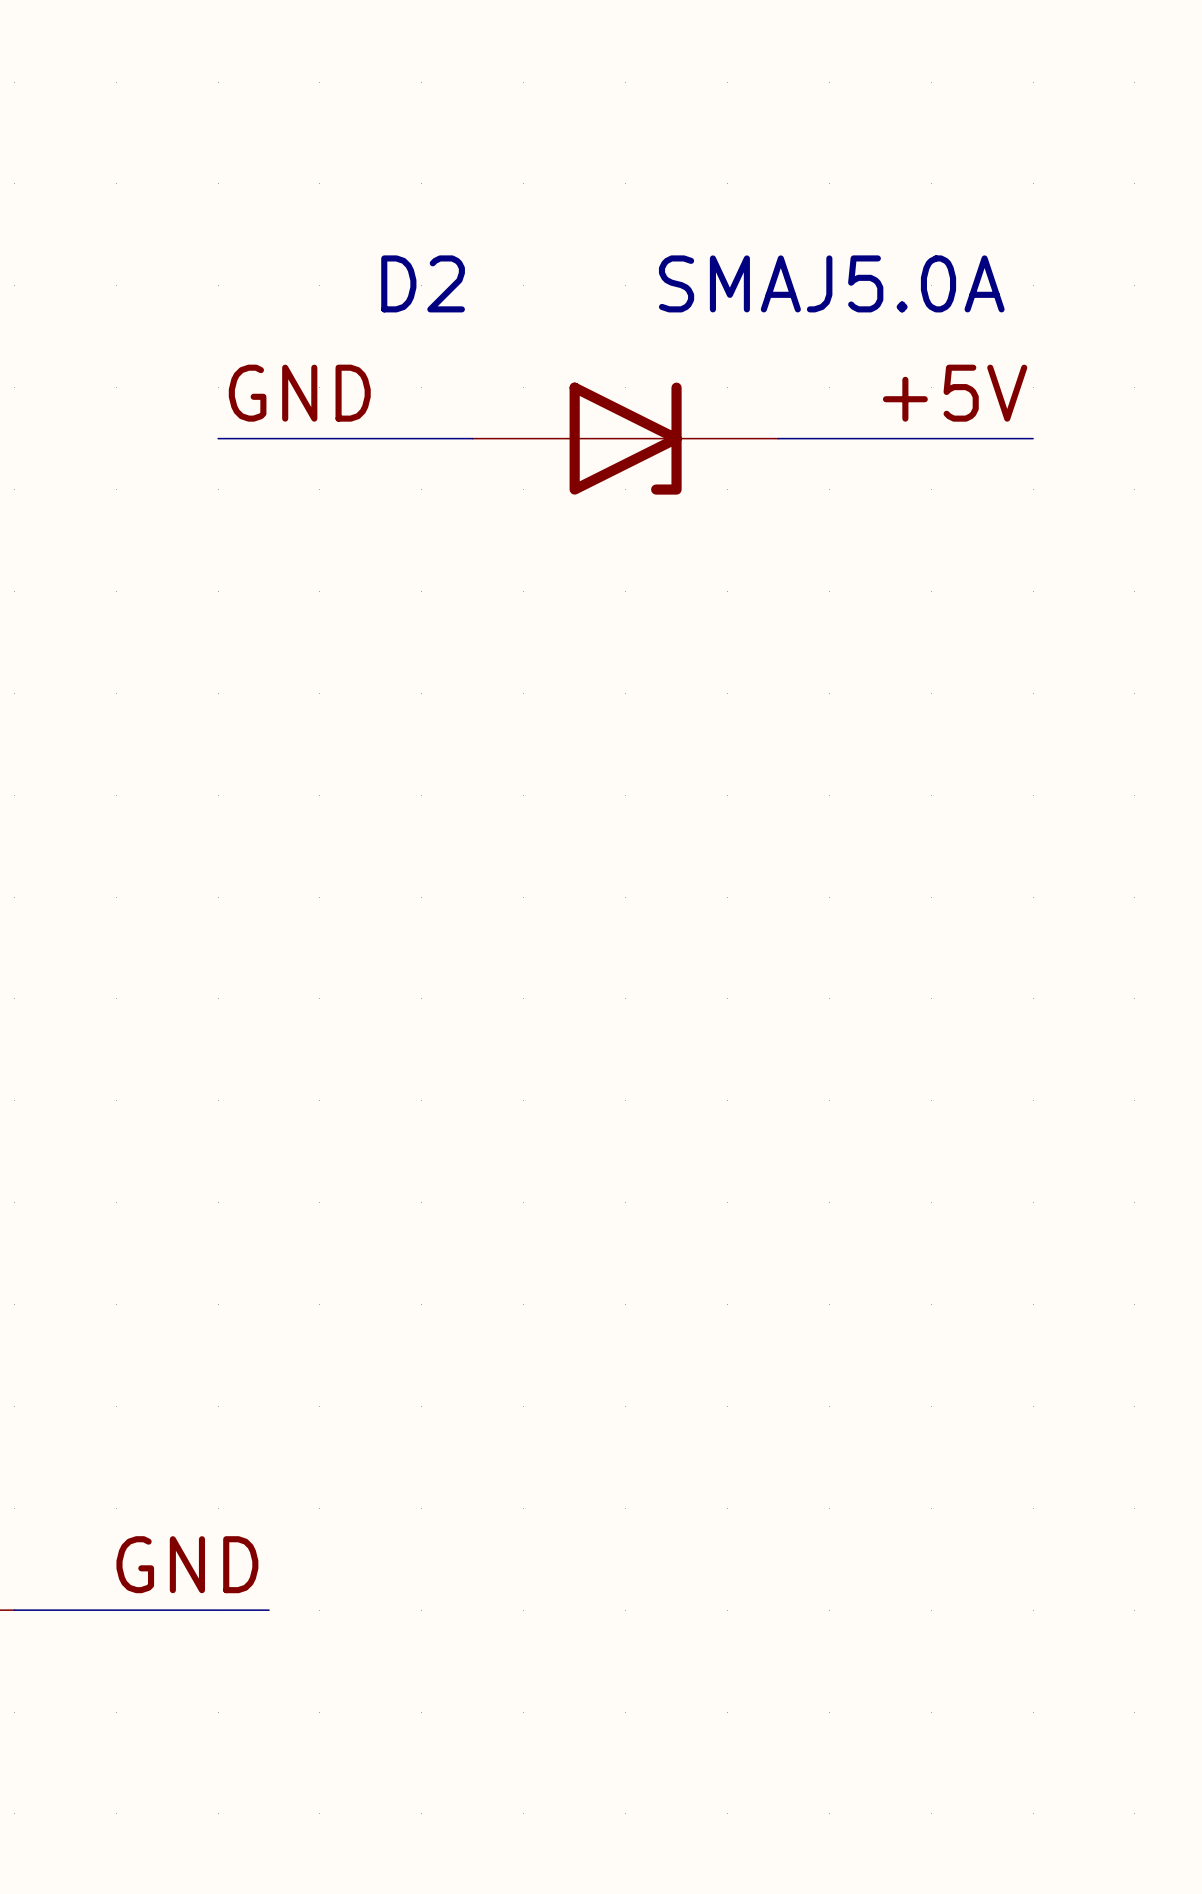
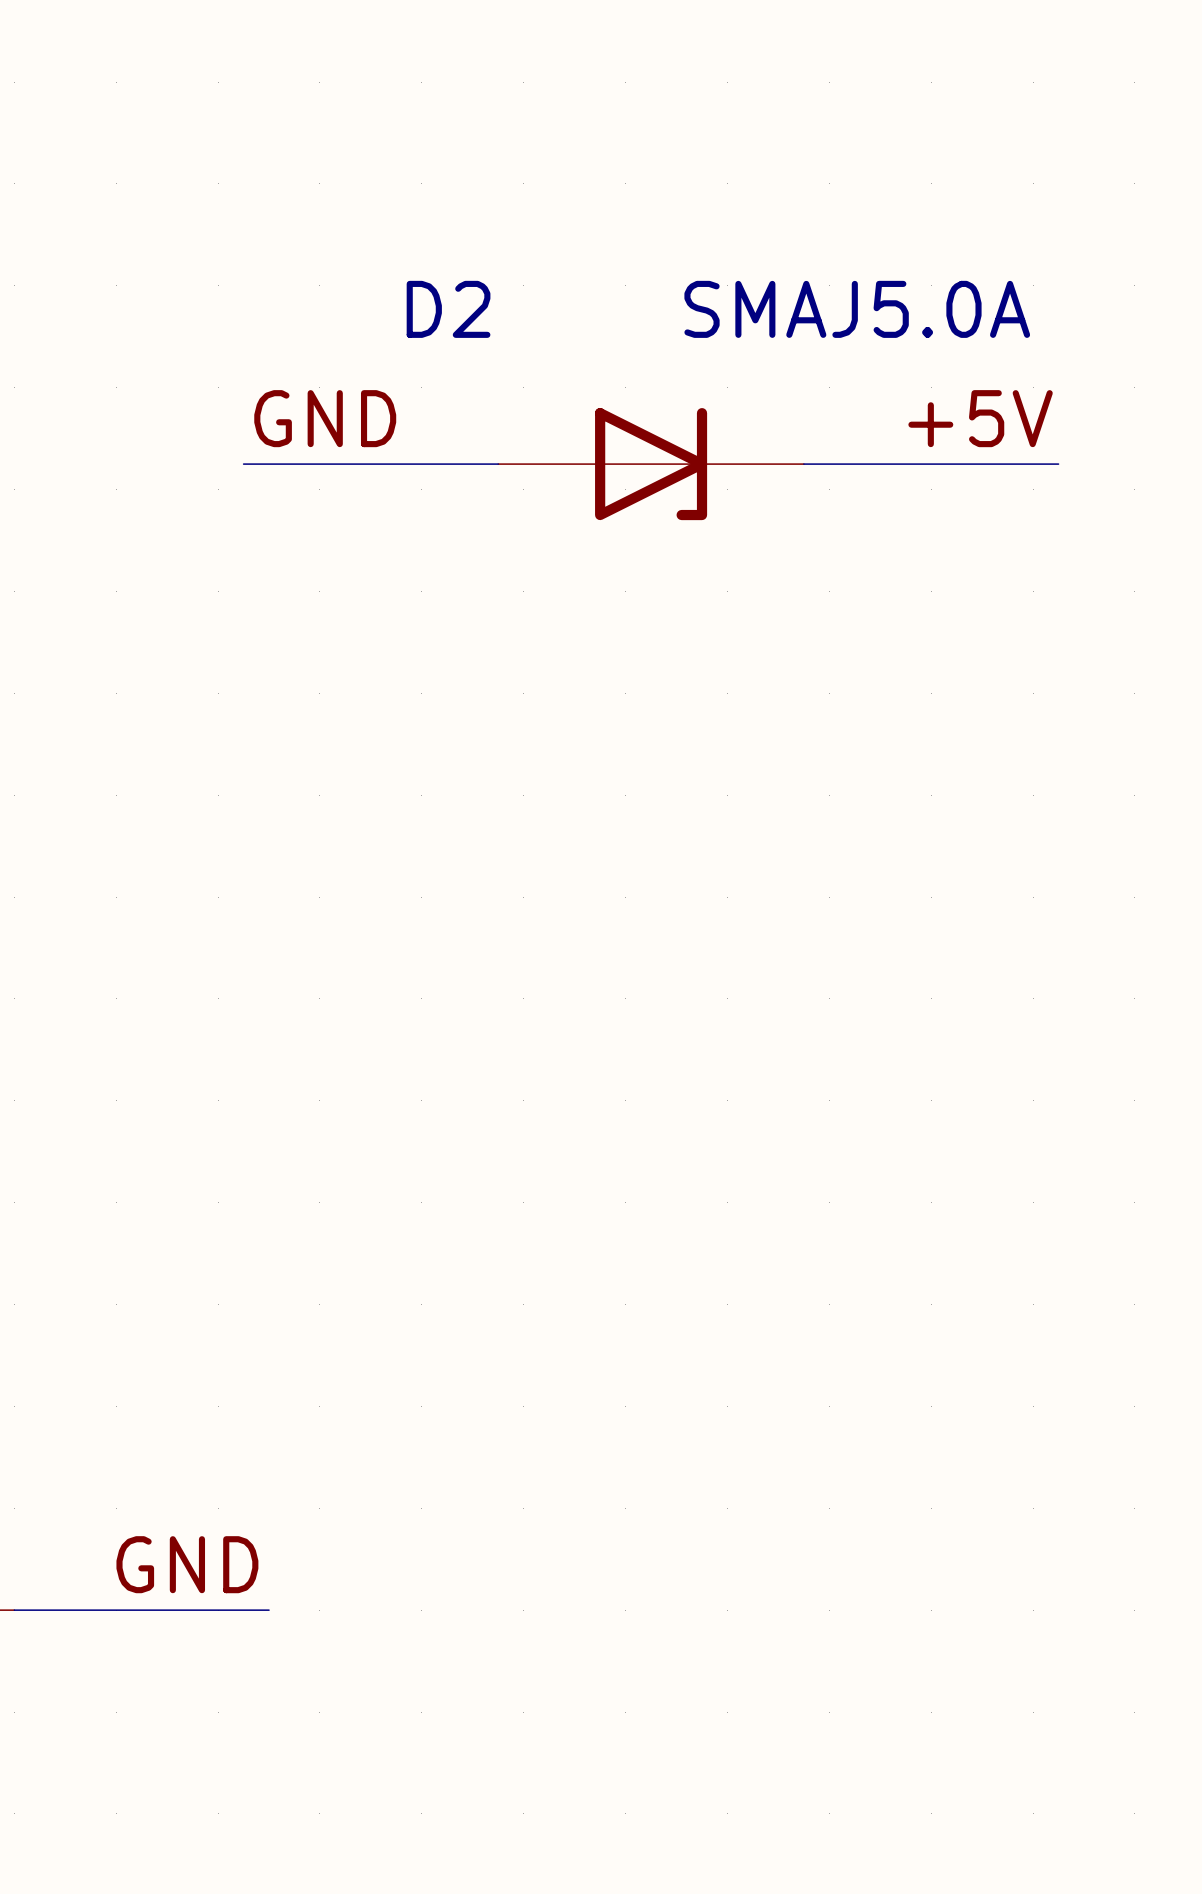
label position: GND (299, 393) -> GND (325, 418)
label position: +5V (955, 393) -> +5V (980, 418)
wire: (218, 438) (472, 438) -> (243, 464) (498, 464)
D2 position: (625, 438) -> (651, 464)
wire: (778, 438) (1033, 438) -> (803, 464) (1058, 464)

